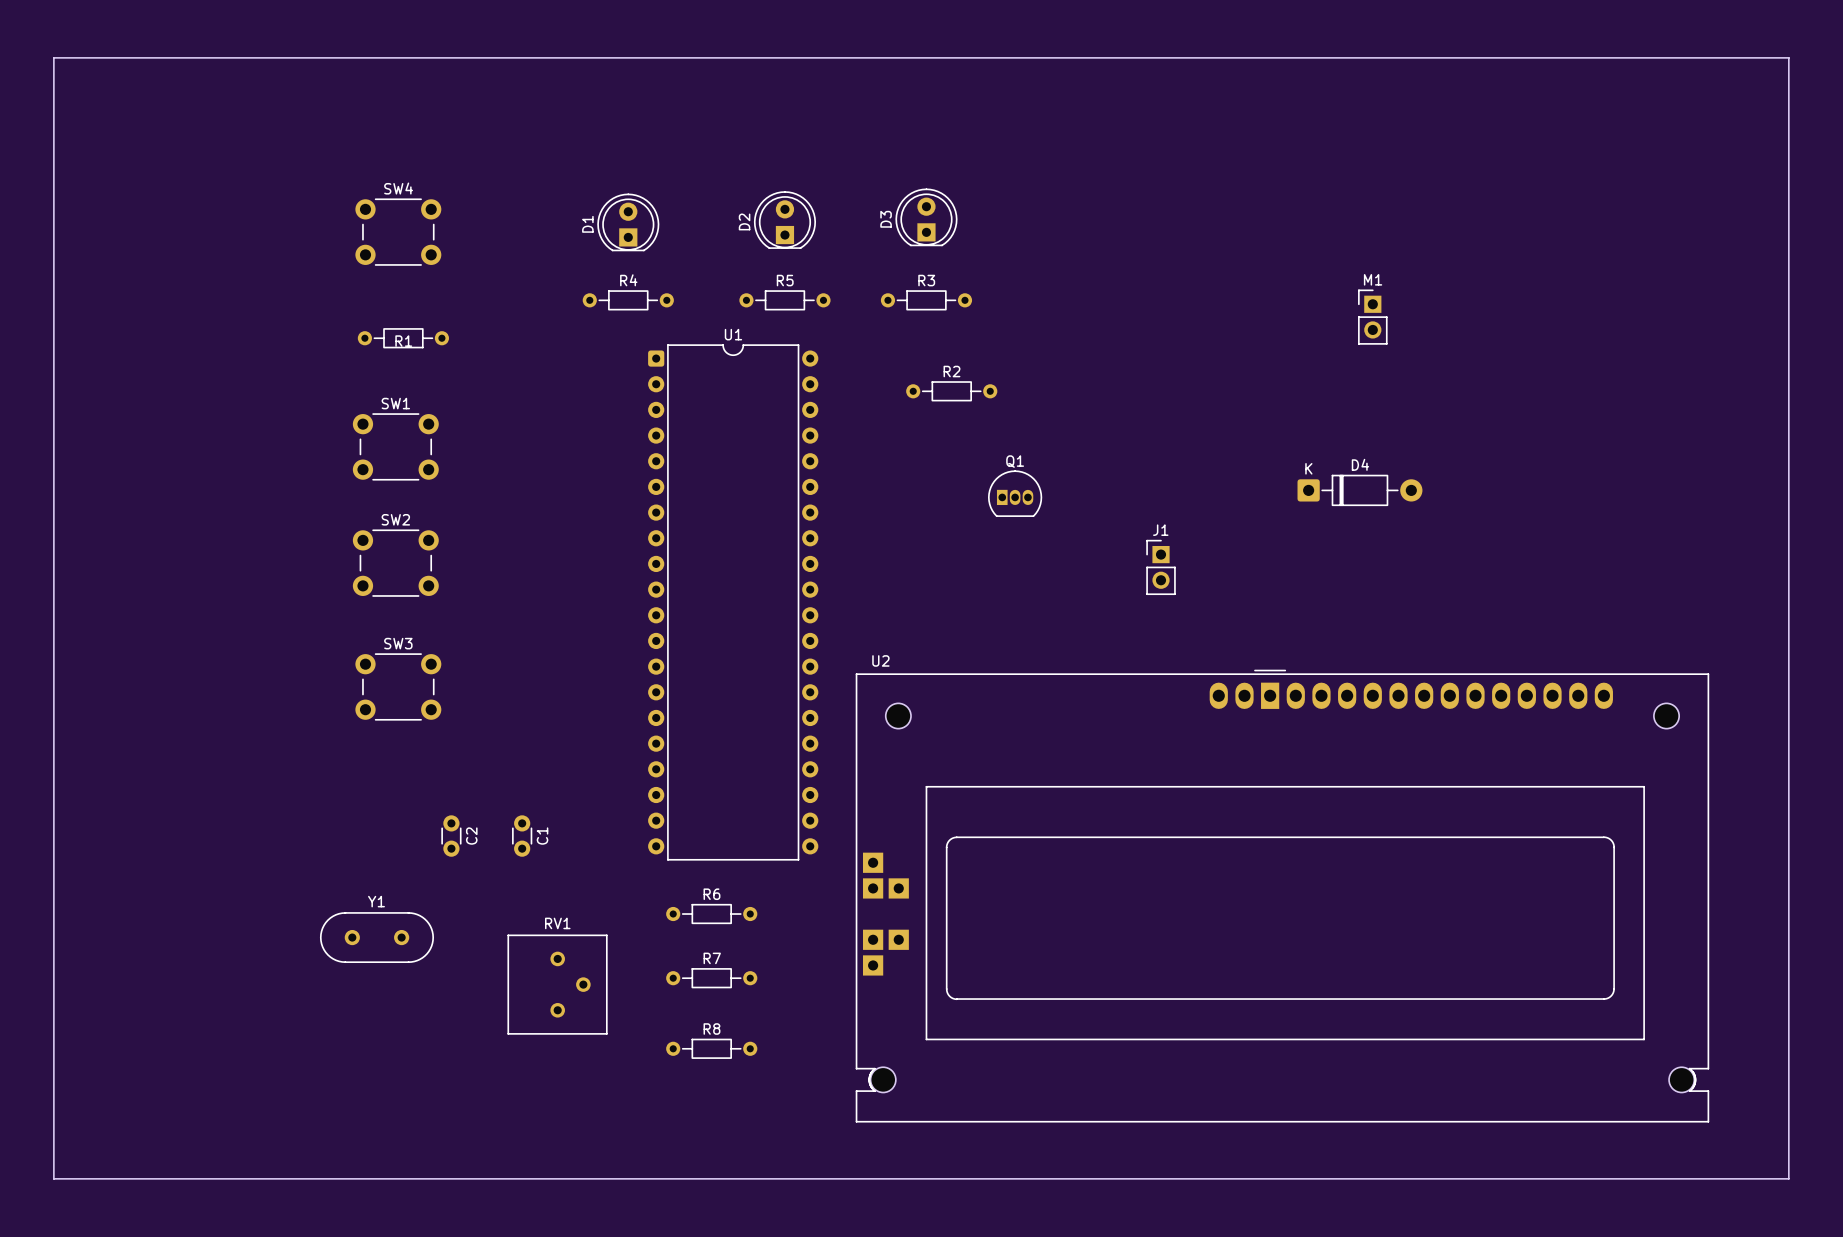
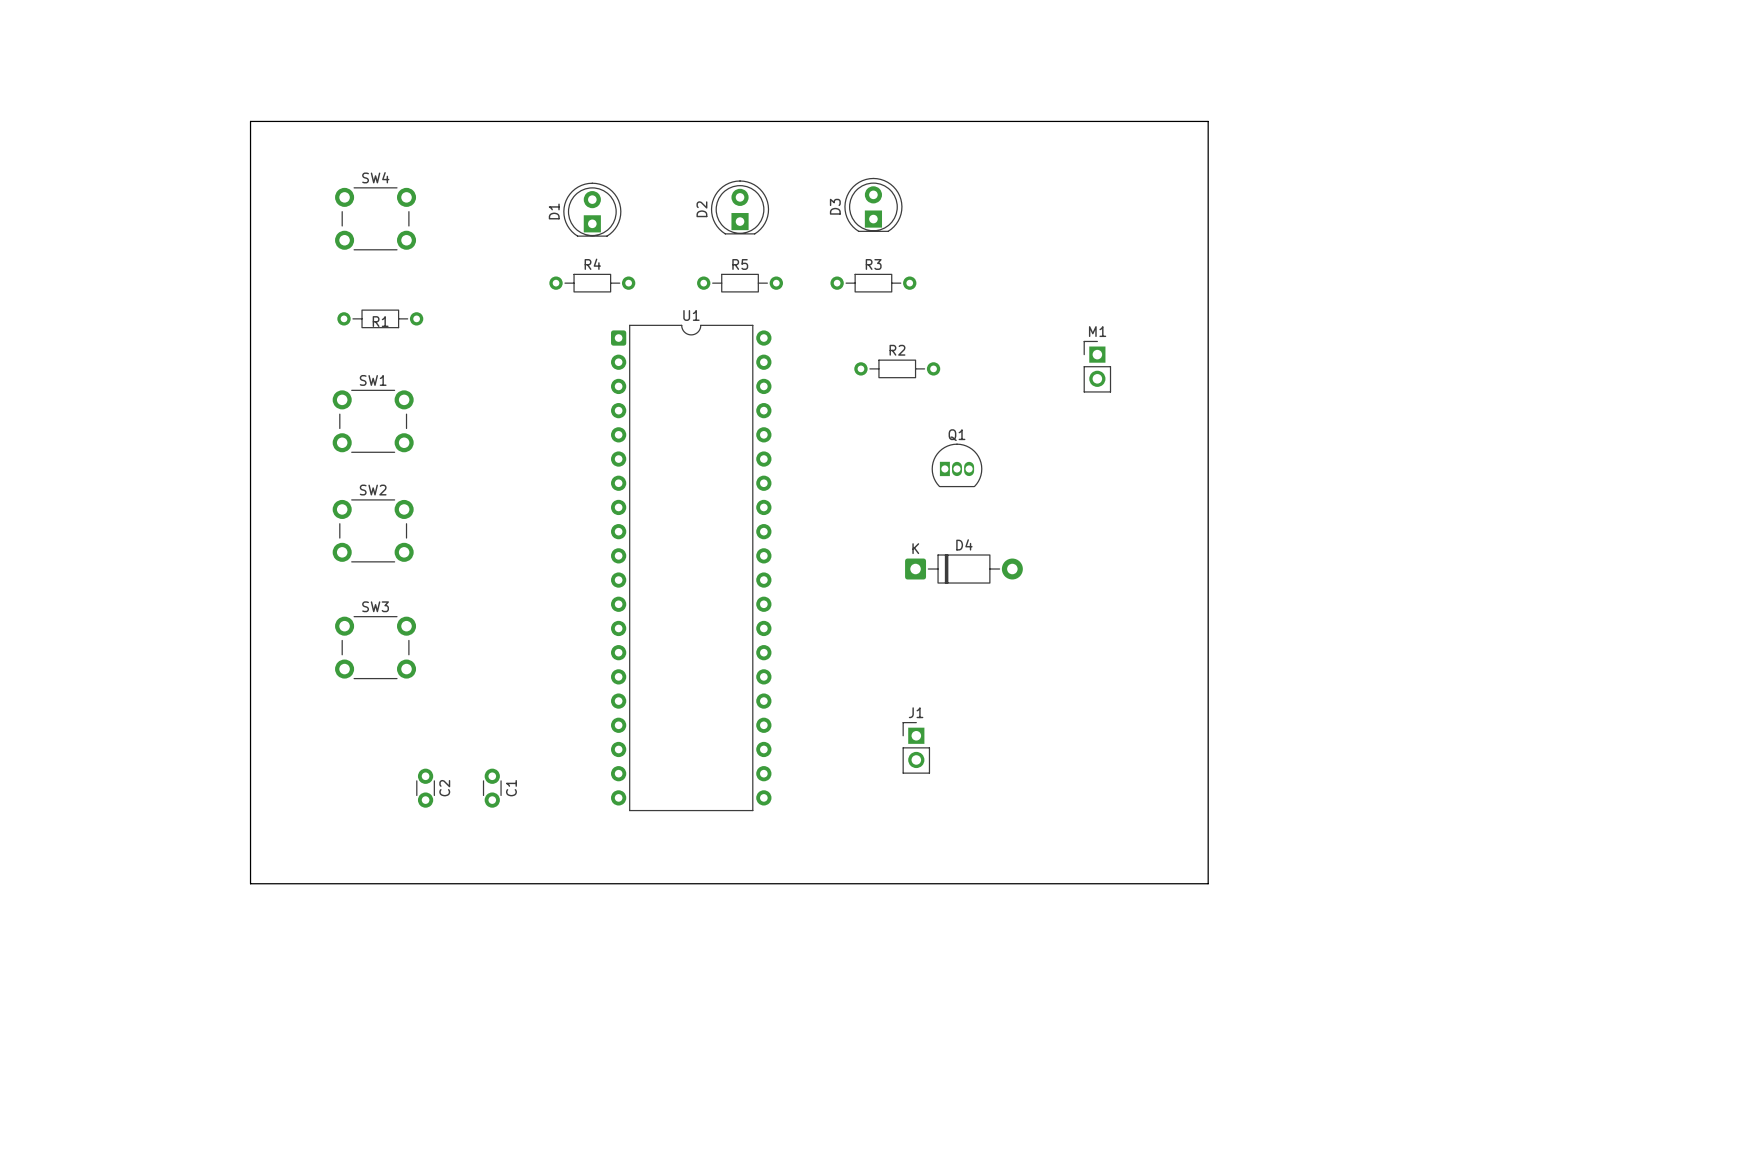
board edge: (53, 57) (1788, 57) (1788, 1178) (53, 1178) (53, 57) -> none
board edge: none -> (250, 121) (1208, 121) (1208, 883) (250, 883) (250, 121)
M1 position: (1372, 317) -> (1097, 366)
D4 position: (1359, 490) -> (963, 569)
J1 position: (1161, 567) -> (916, 747)
U2: (1282, 896) -> none
R6: (711, 914) -> none
Y1: (376, 937) -> none
R7: (711, 978) -> none
RV1: (557, 984) -> none
R8: (711, 1048) -> none

